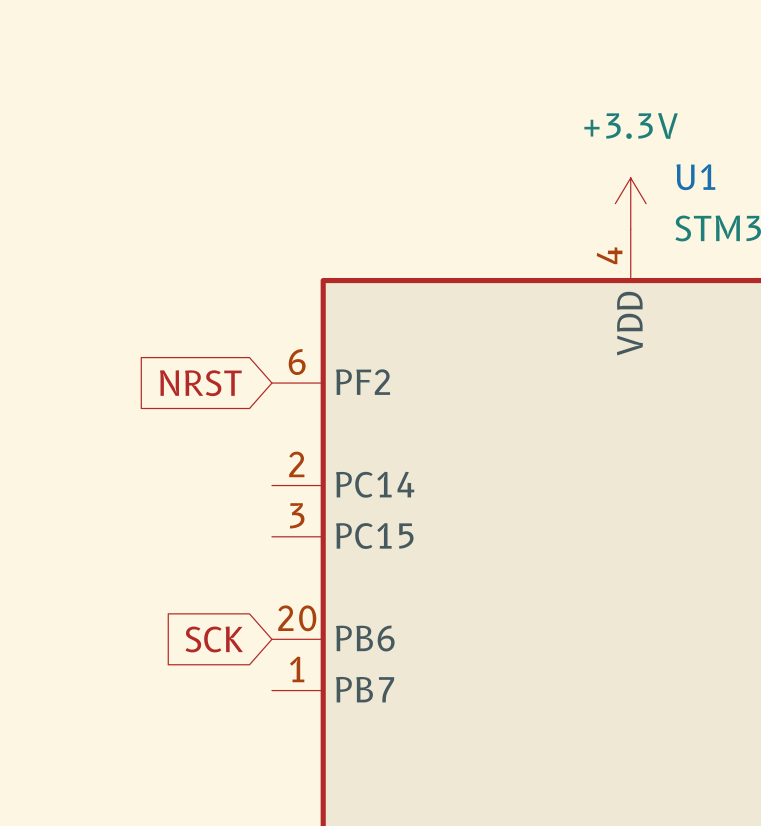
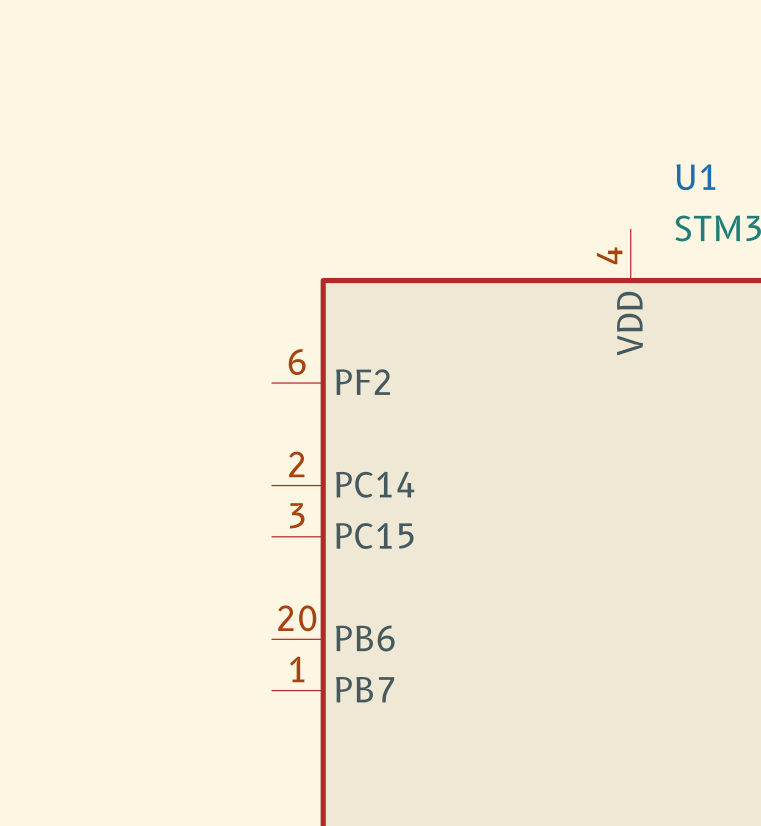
power symbol: +3.3V (630, 203) -> none
global label: NRST (200, 383) -> none
global label: SCK (214, 639) -> none

